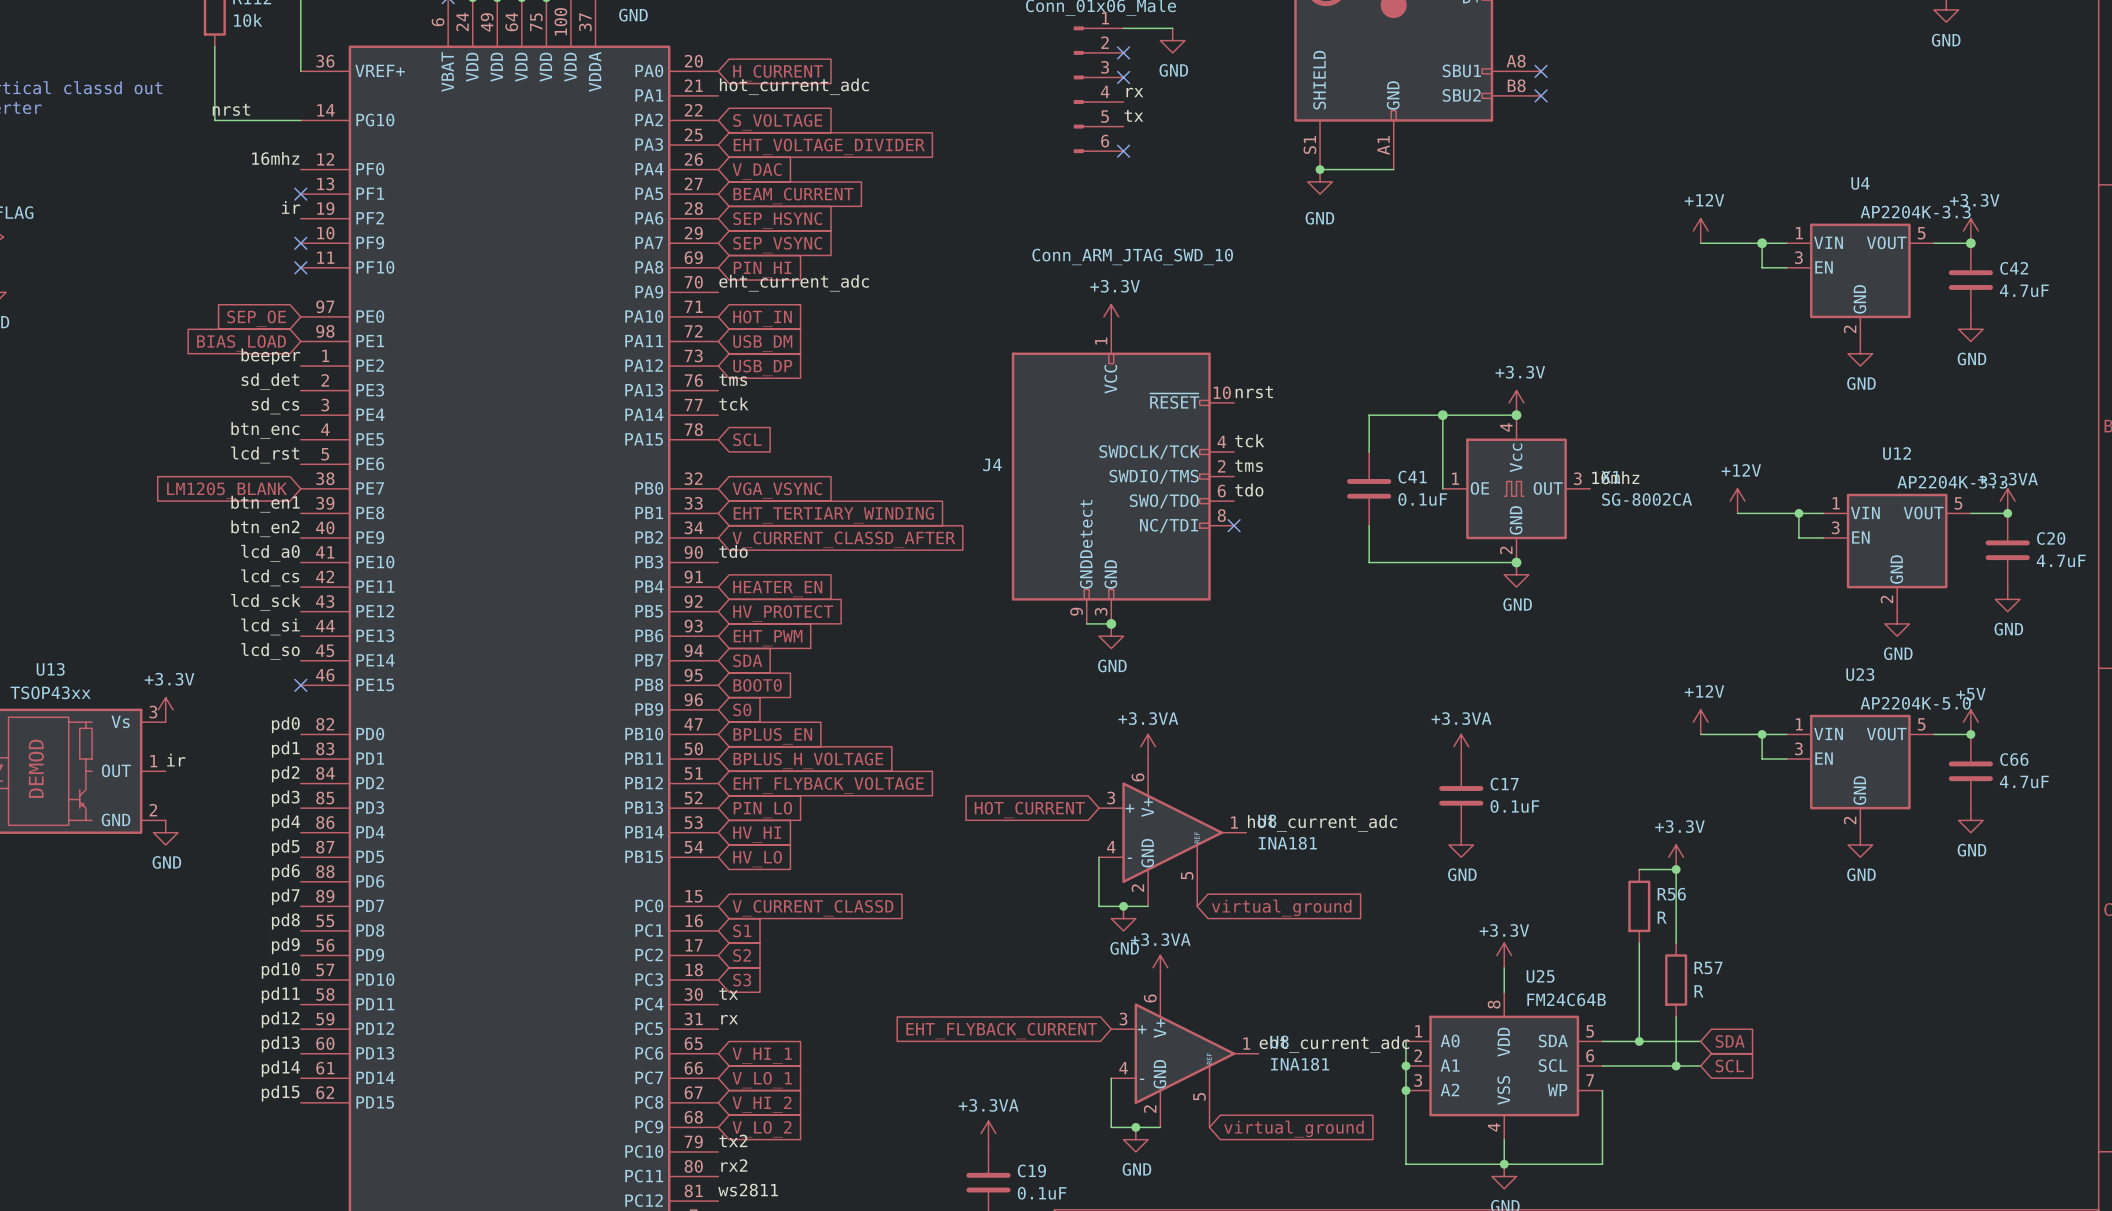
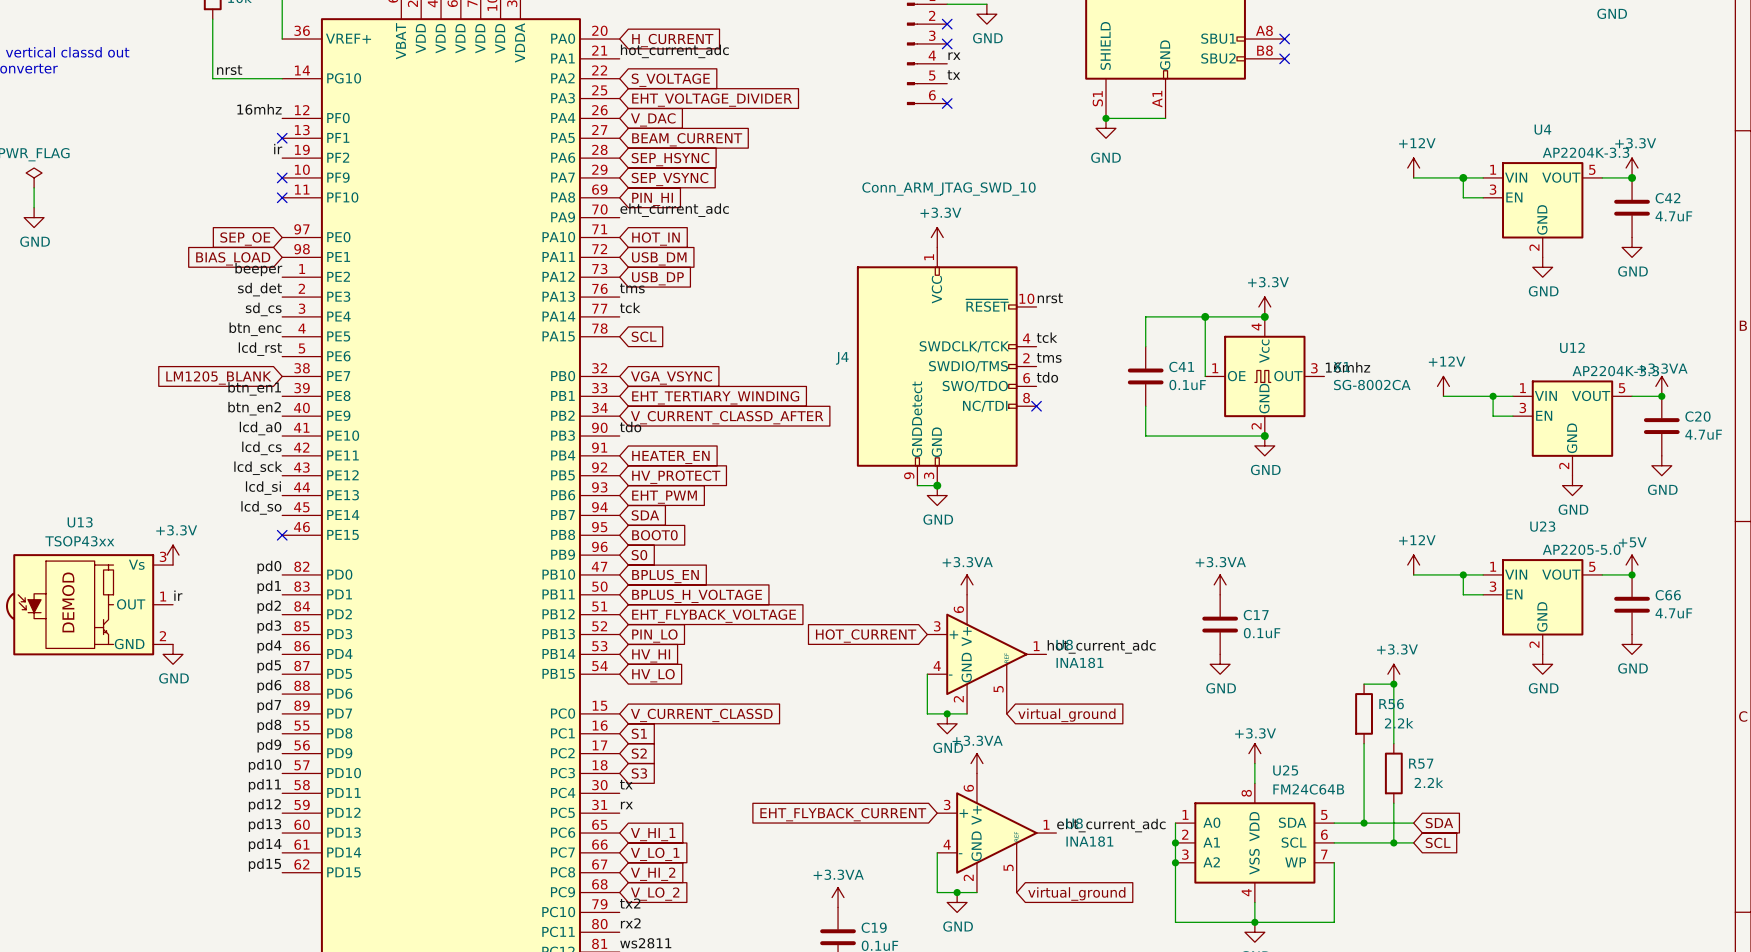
U23 value: AP2204K-5.0 (1915, 703) -> AP2205-5.0 (1581, 549)
R56 value: R (1662, 917) -> 2.2k (1399, 723)
R57 value: R (1698, 991) -> 2.2k (1428, 782)

